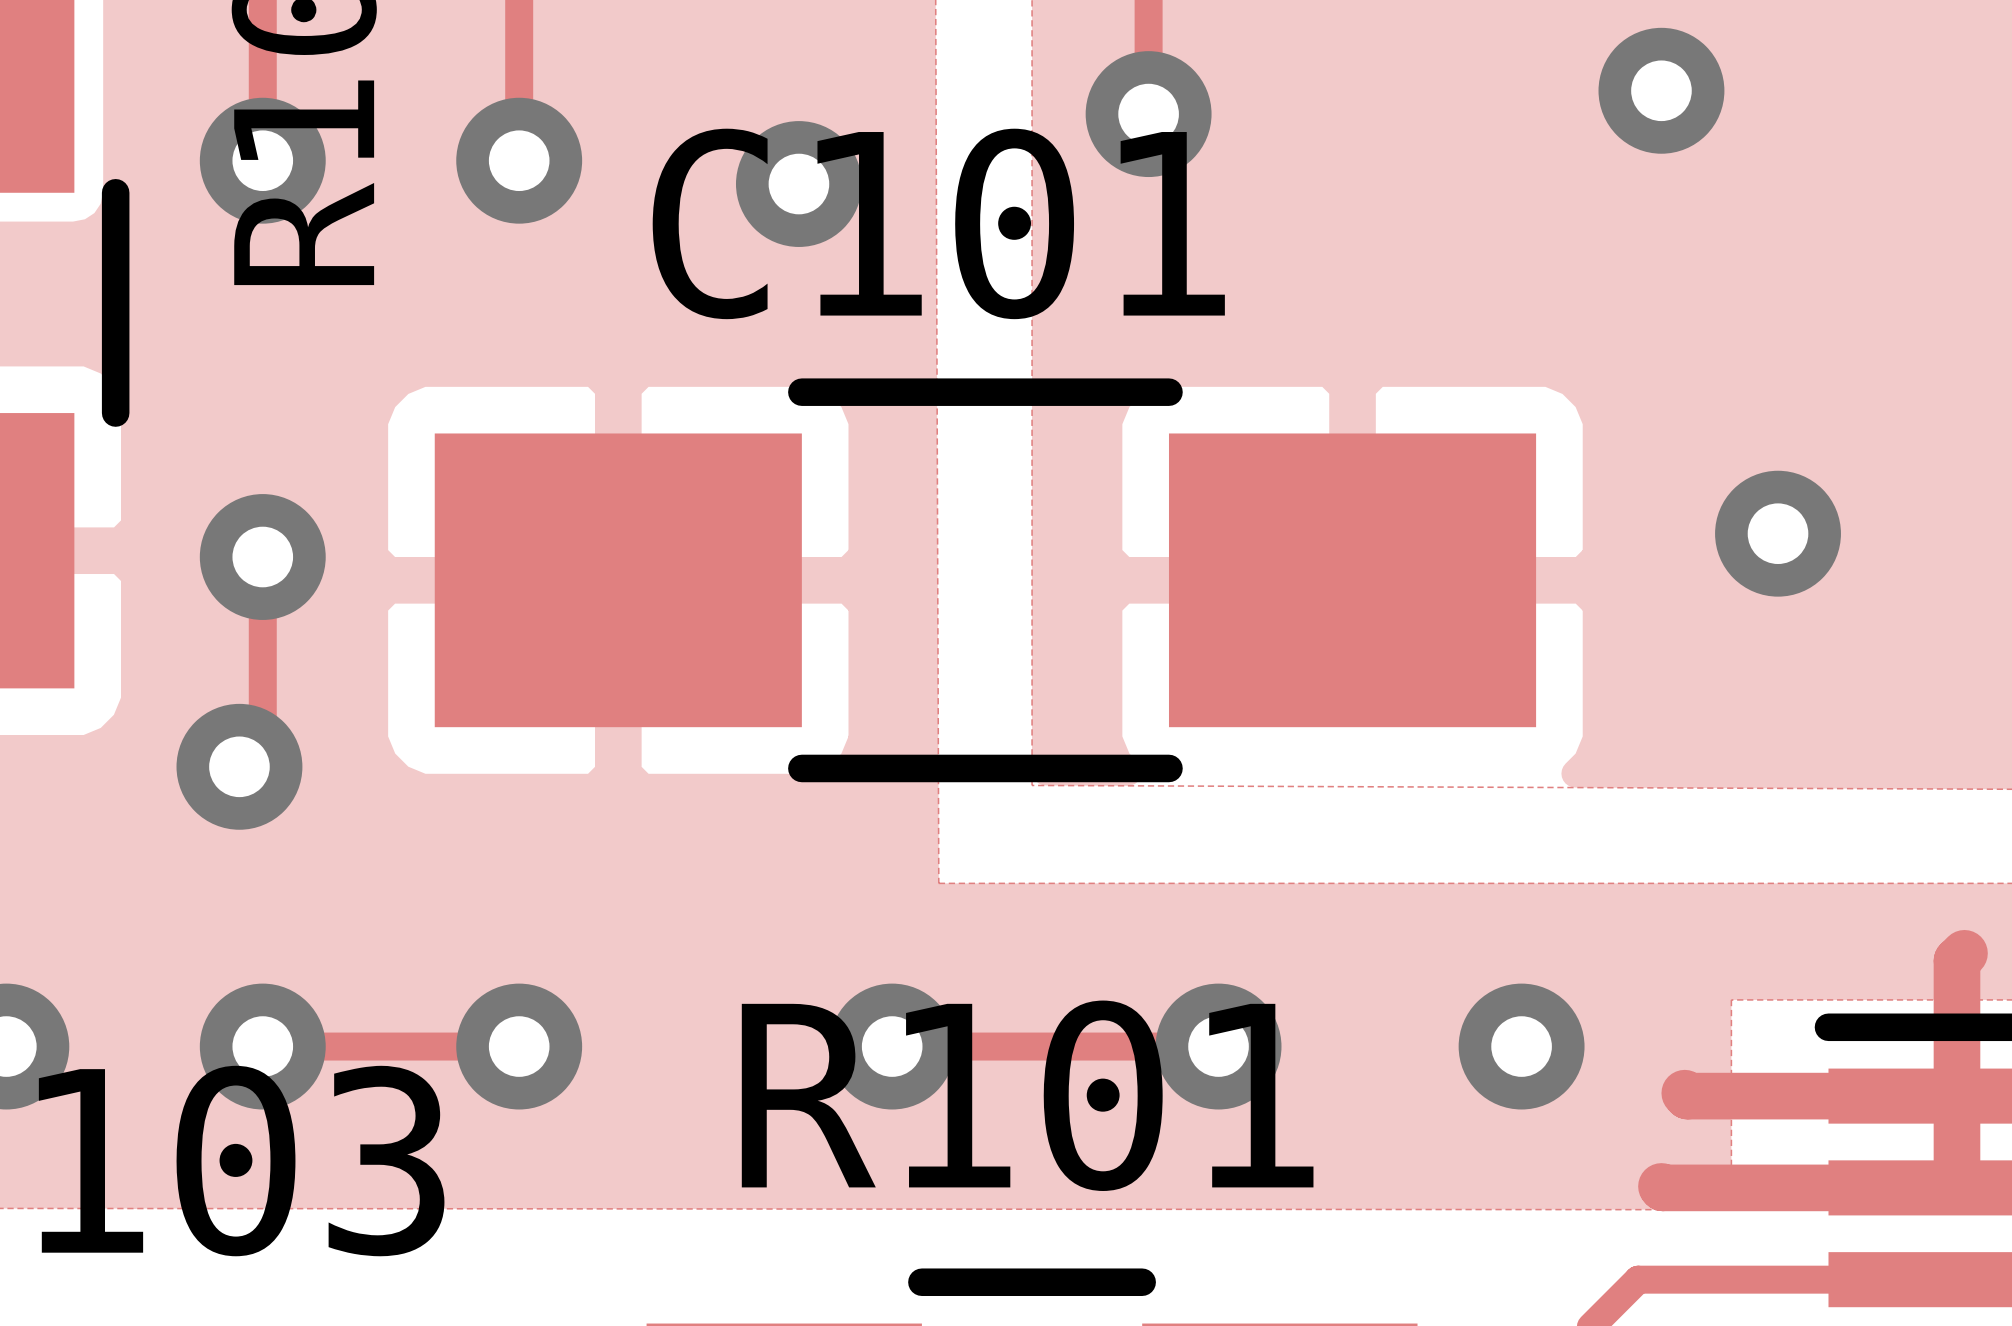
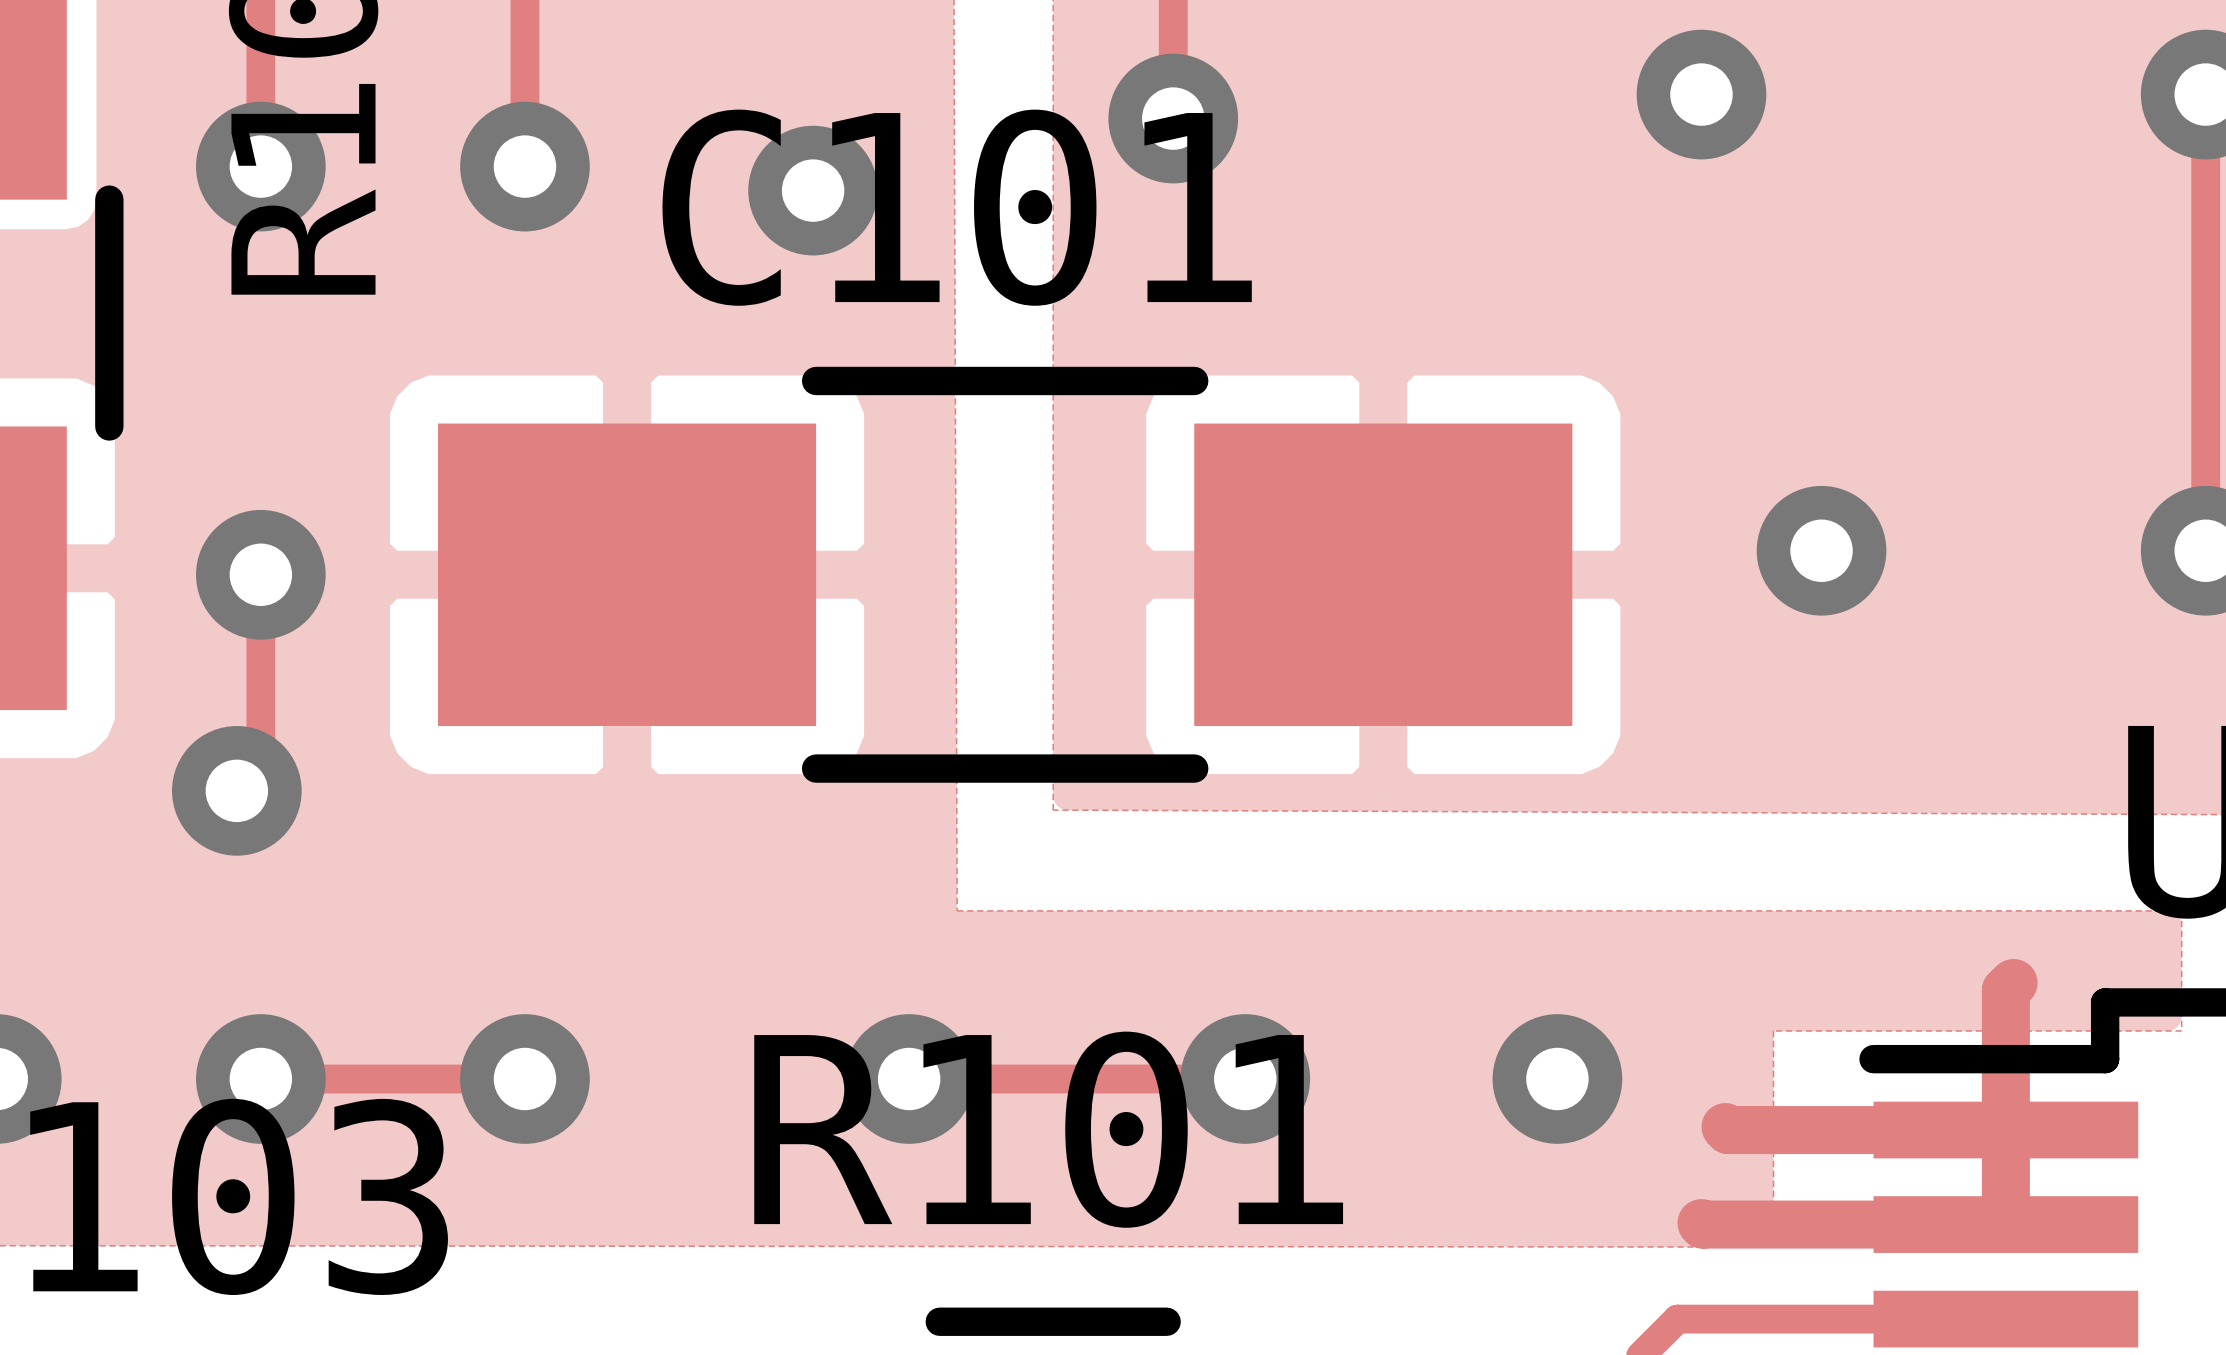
C101 position: (985, 580) -> (1005, 574)

